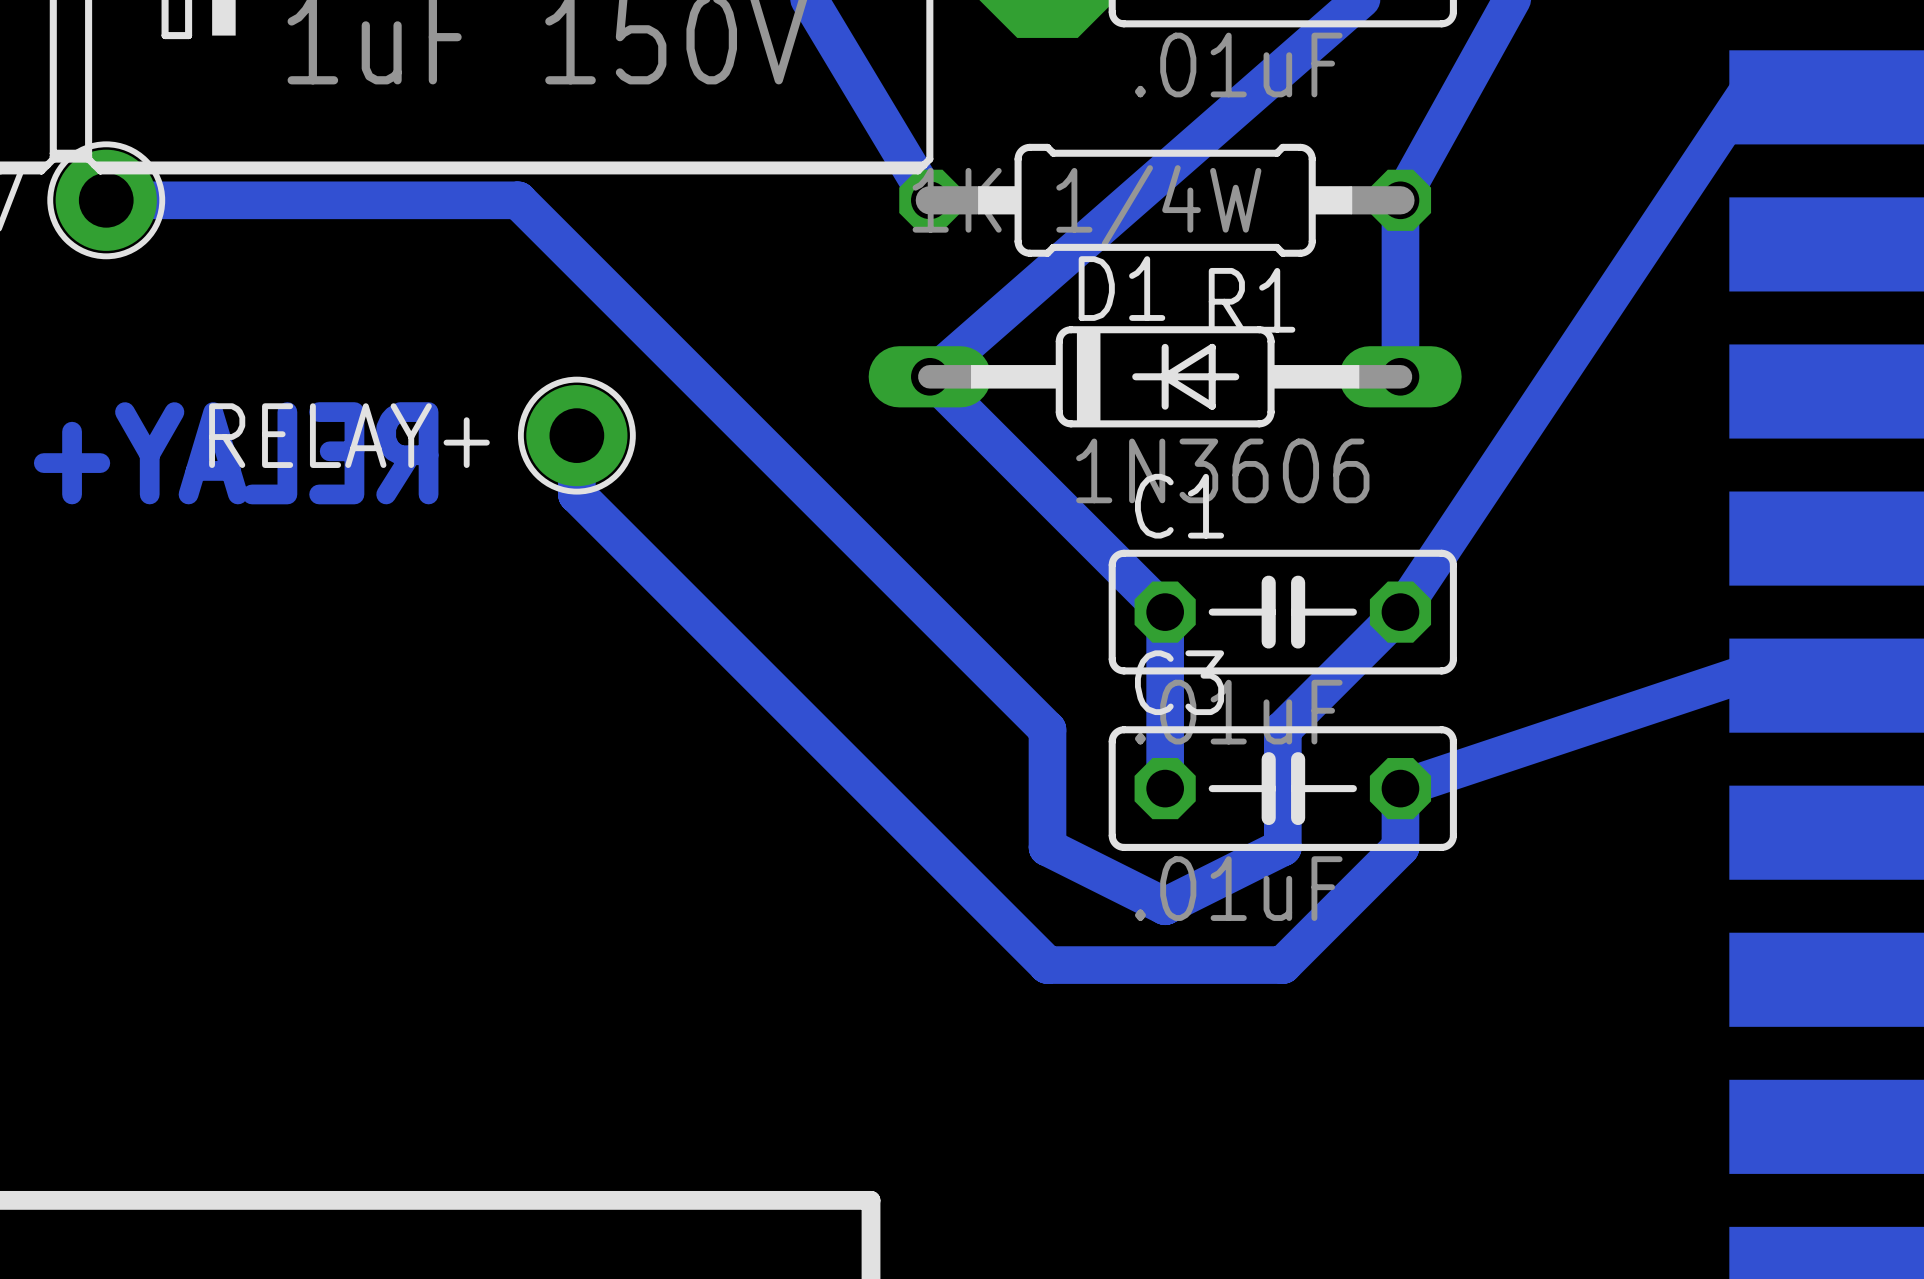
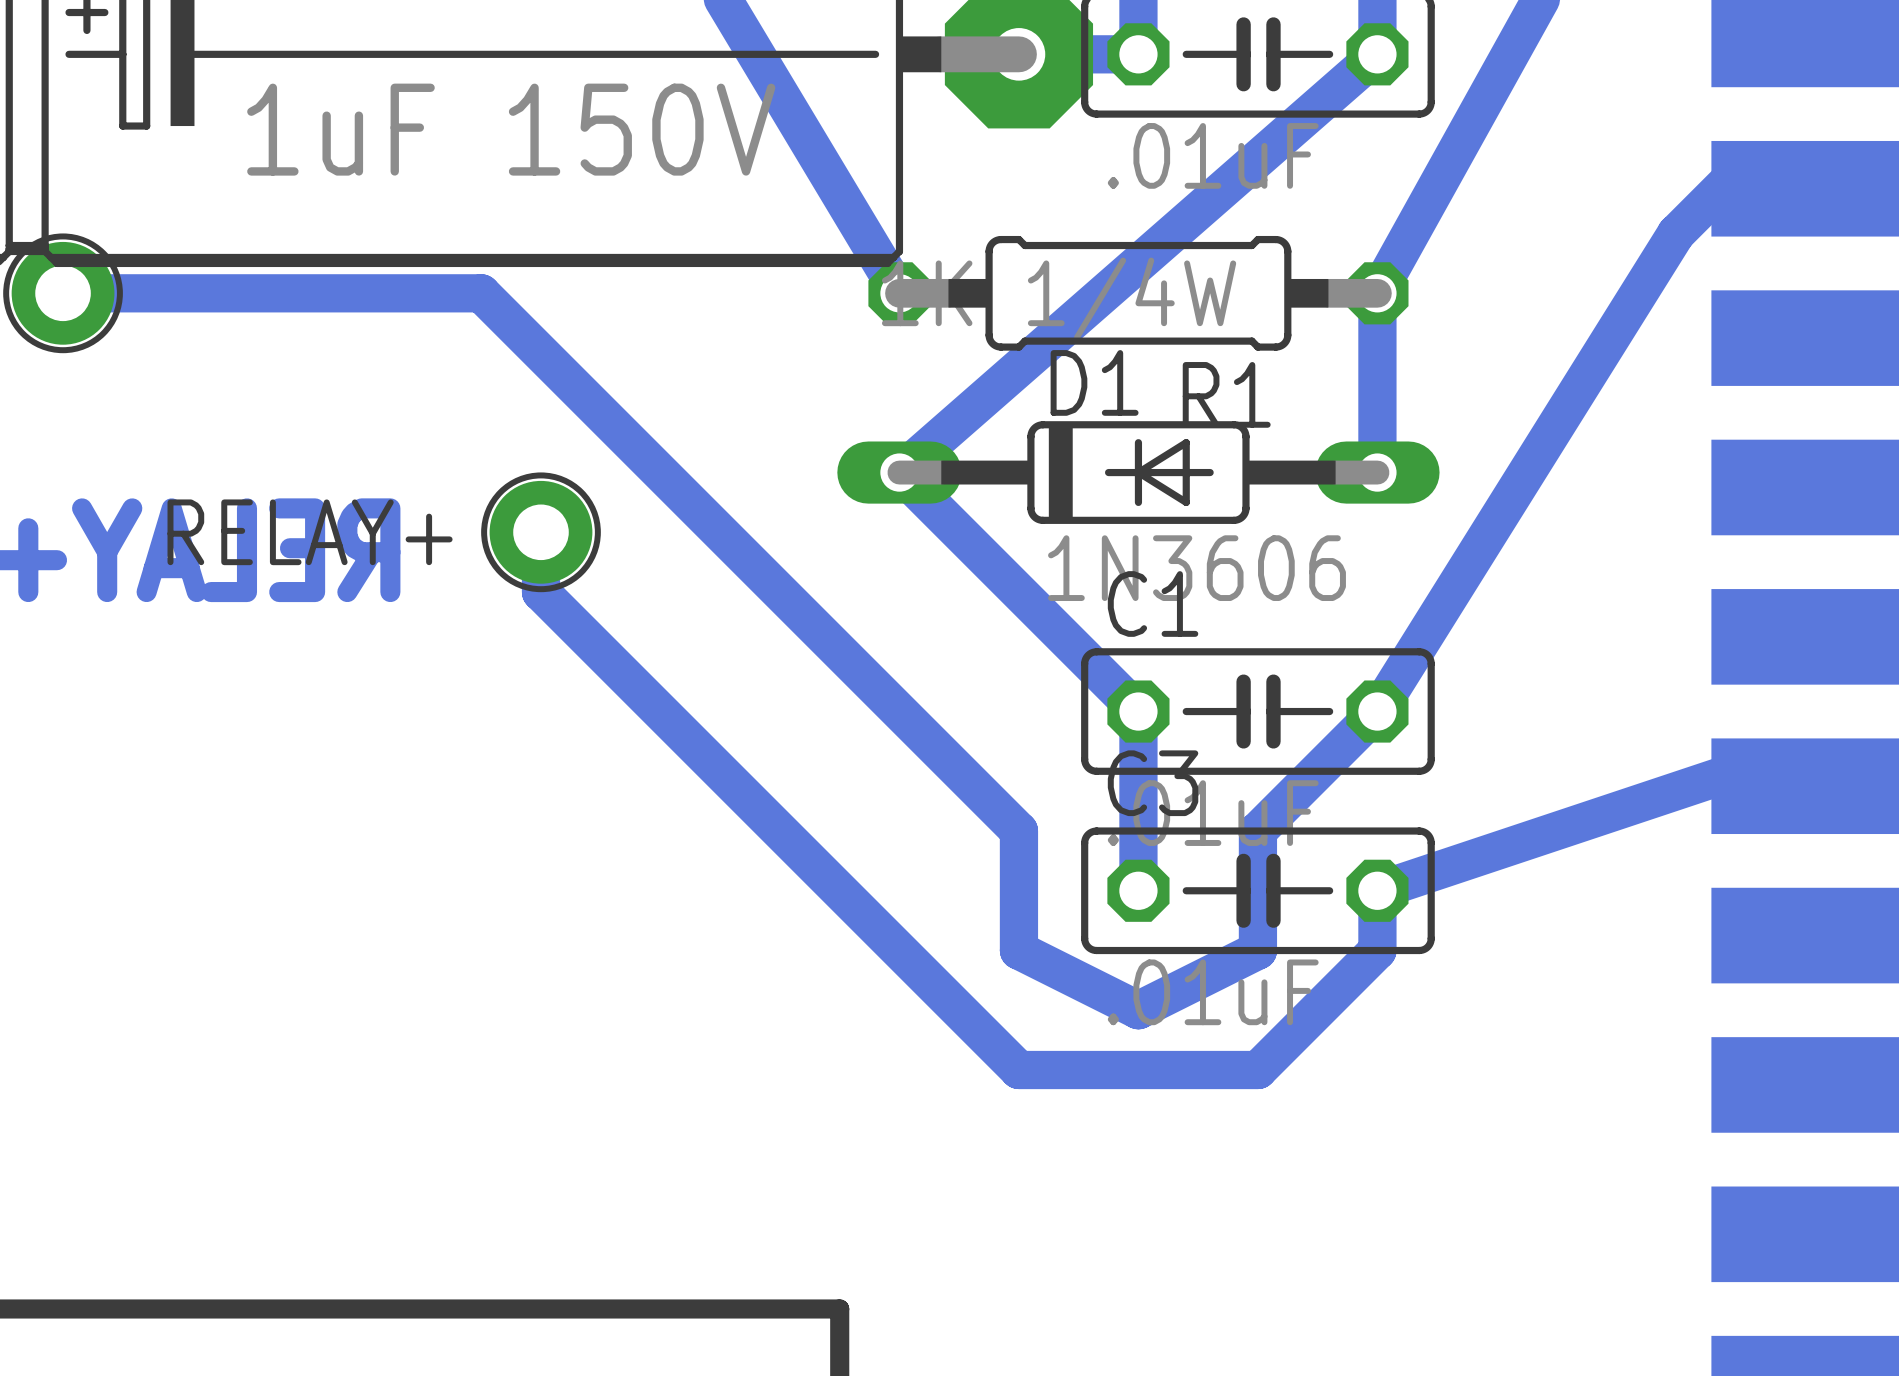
bottom track: (1753, 82) (1400, 612) -> (1735, 173) (1676, 233) (1377, 711)

